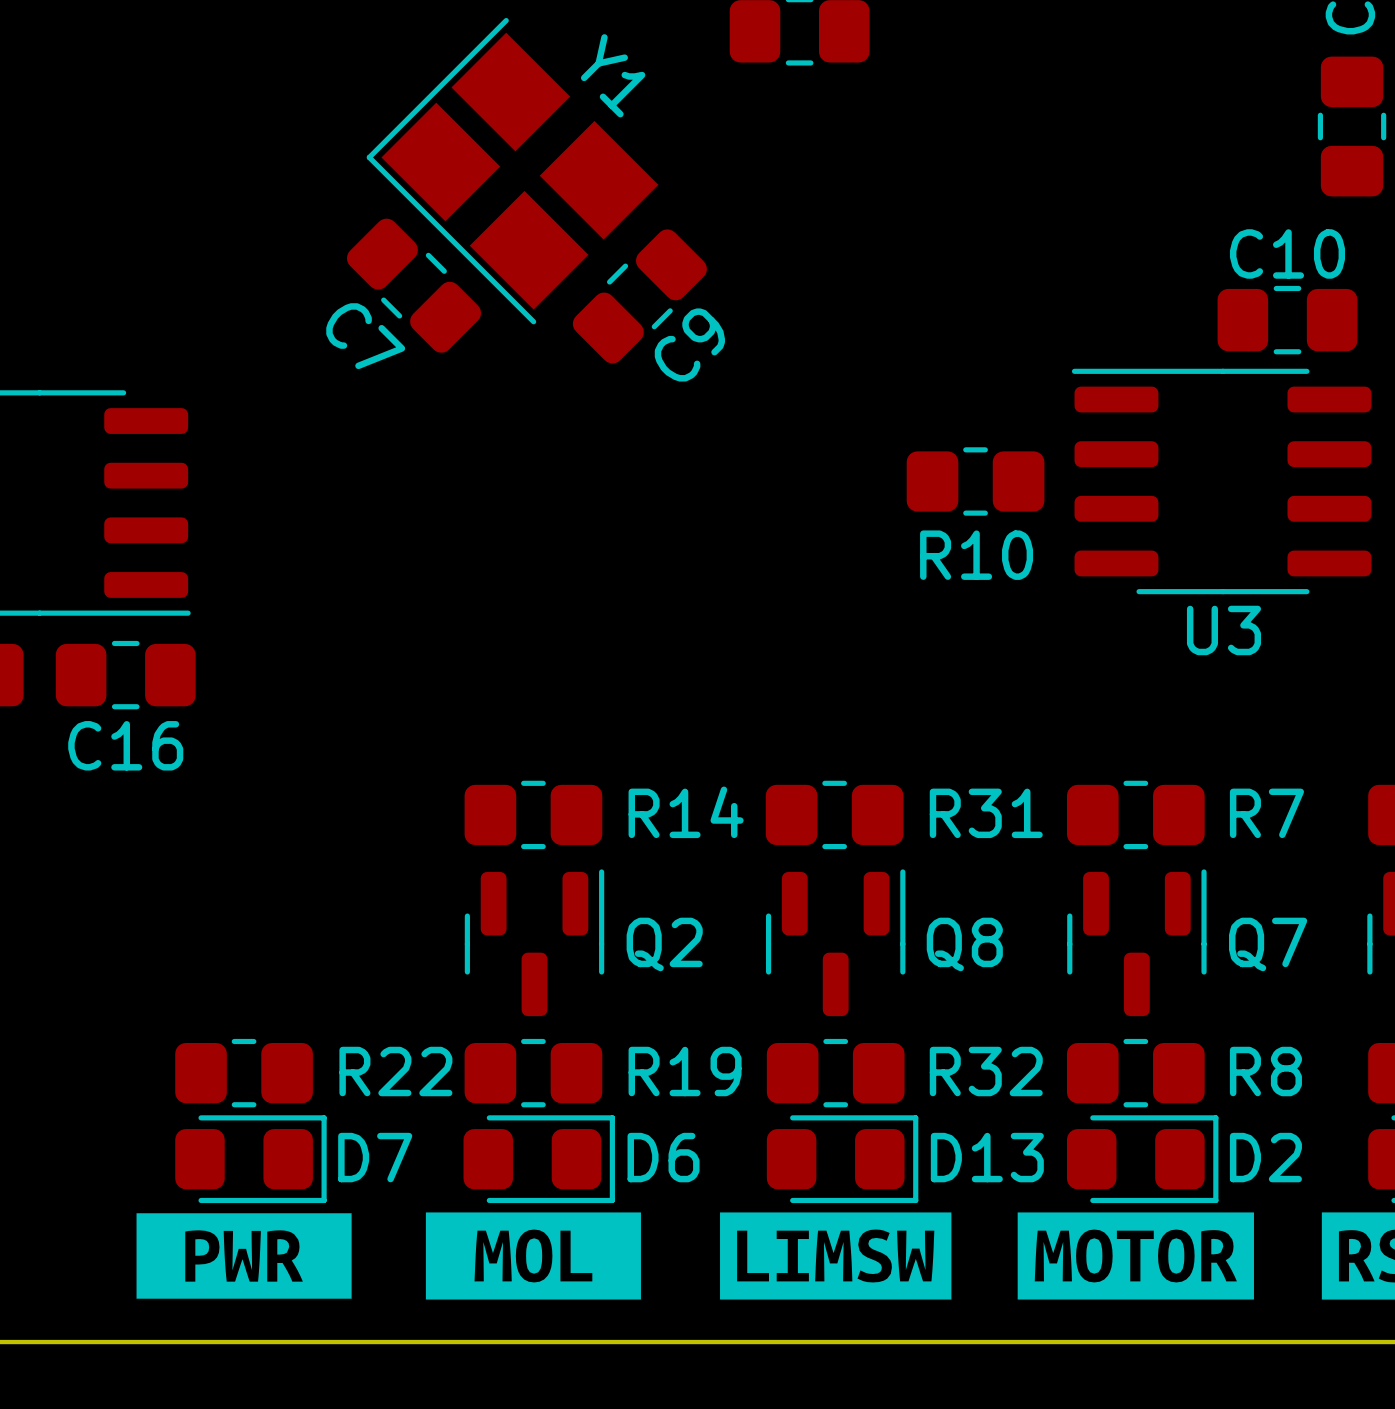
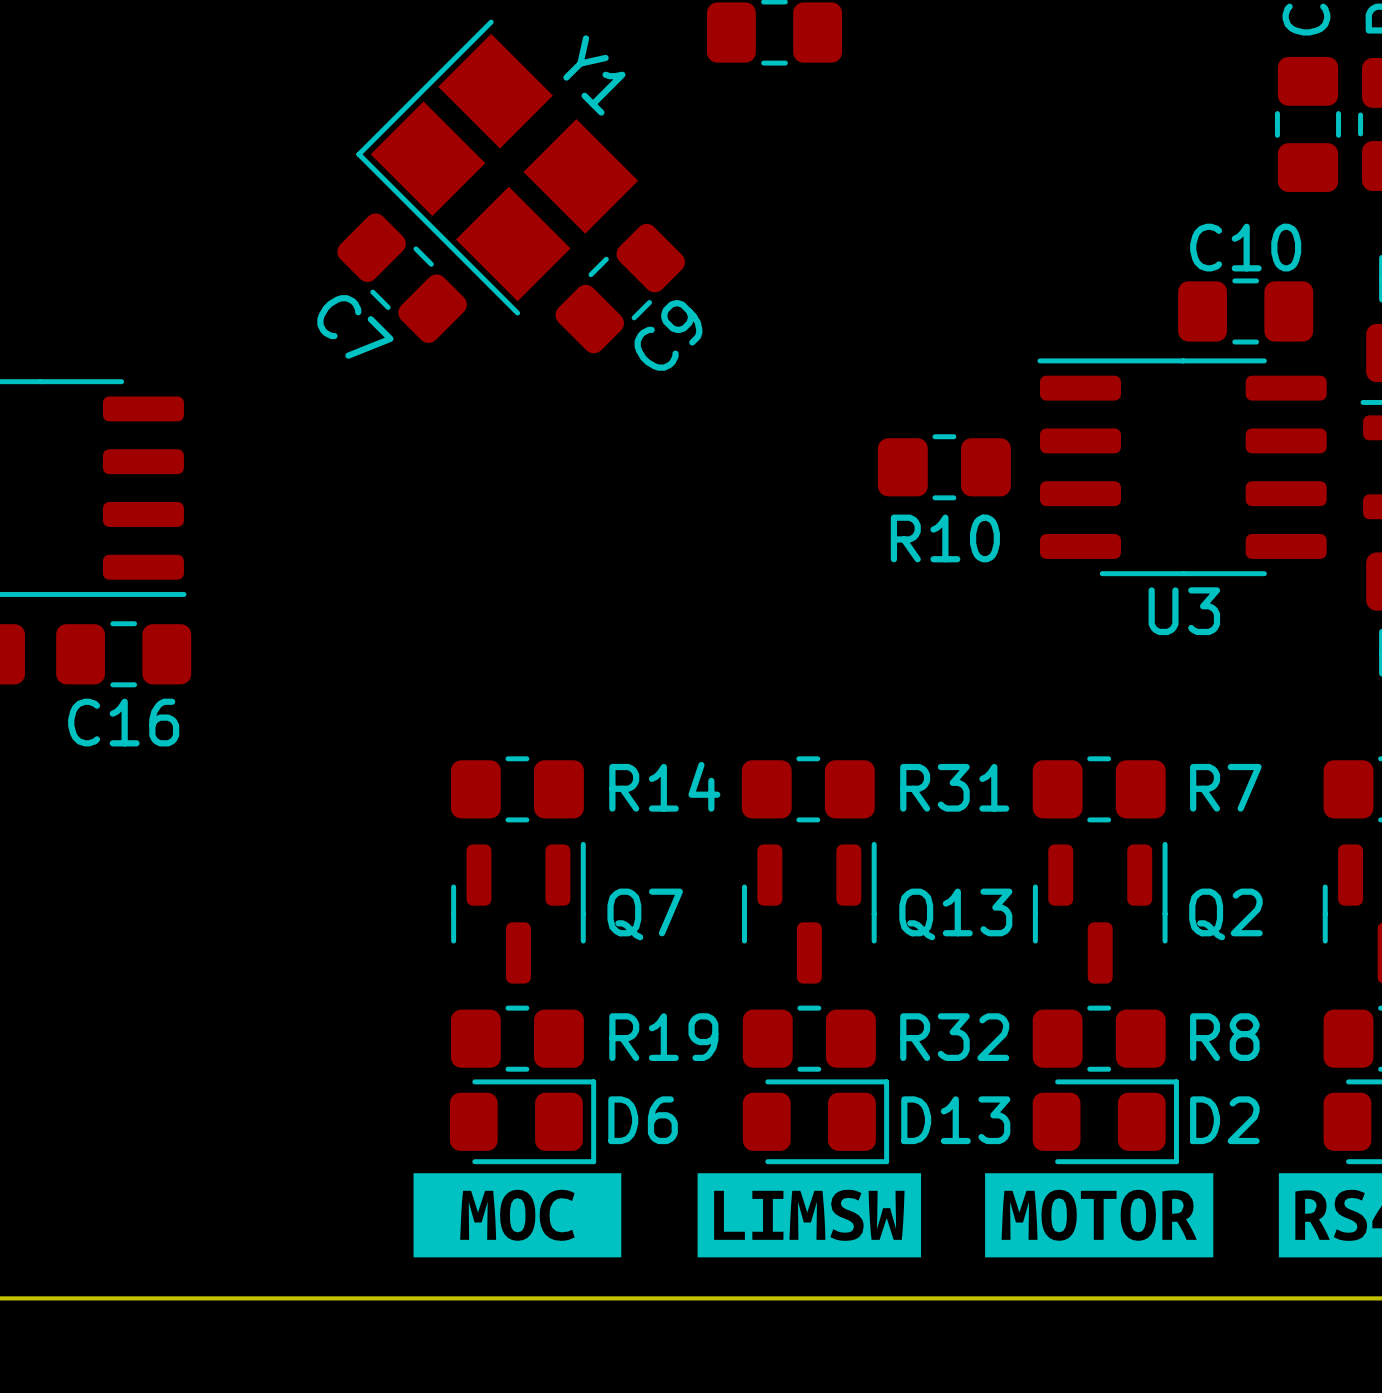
Q2 name: Q2 (664, 944) -> Q7 (645, 914)
Q8 name: Q8 (964, 944) -> Q13 (955, 914)
Q7 name: Q7 (1268, 944) -> Q2 (1225, 914)
R22: (244, 1073) -> none
D7: (250, 1159) -> none
drawing shape: [425, 1212, 641, 1300] -> [413, 1173, 622, 1258]
drawing: [136, 1213, 352, 1299] -> none

